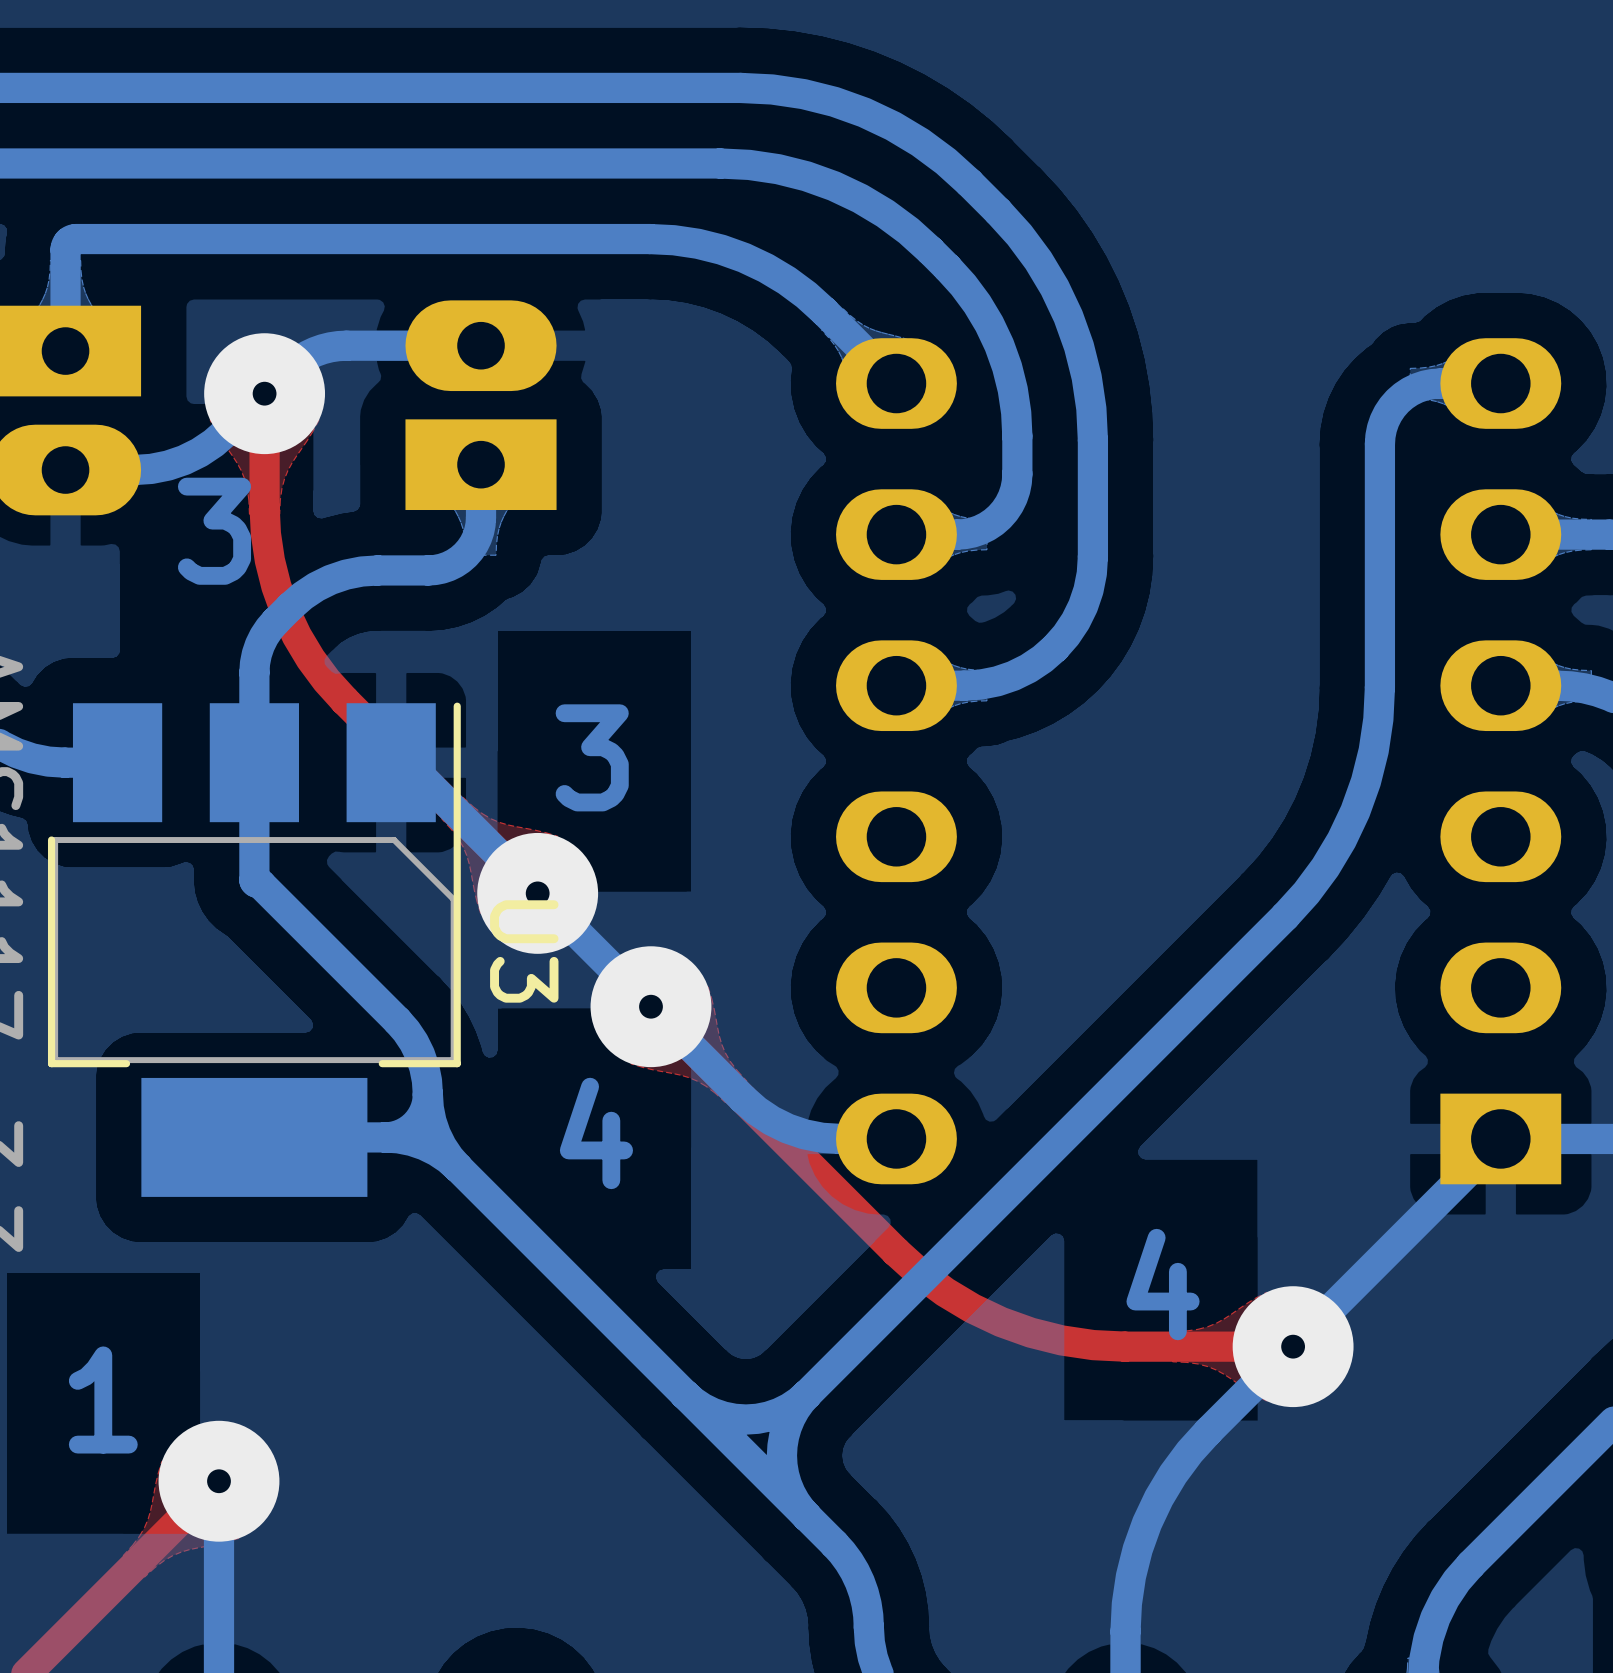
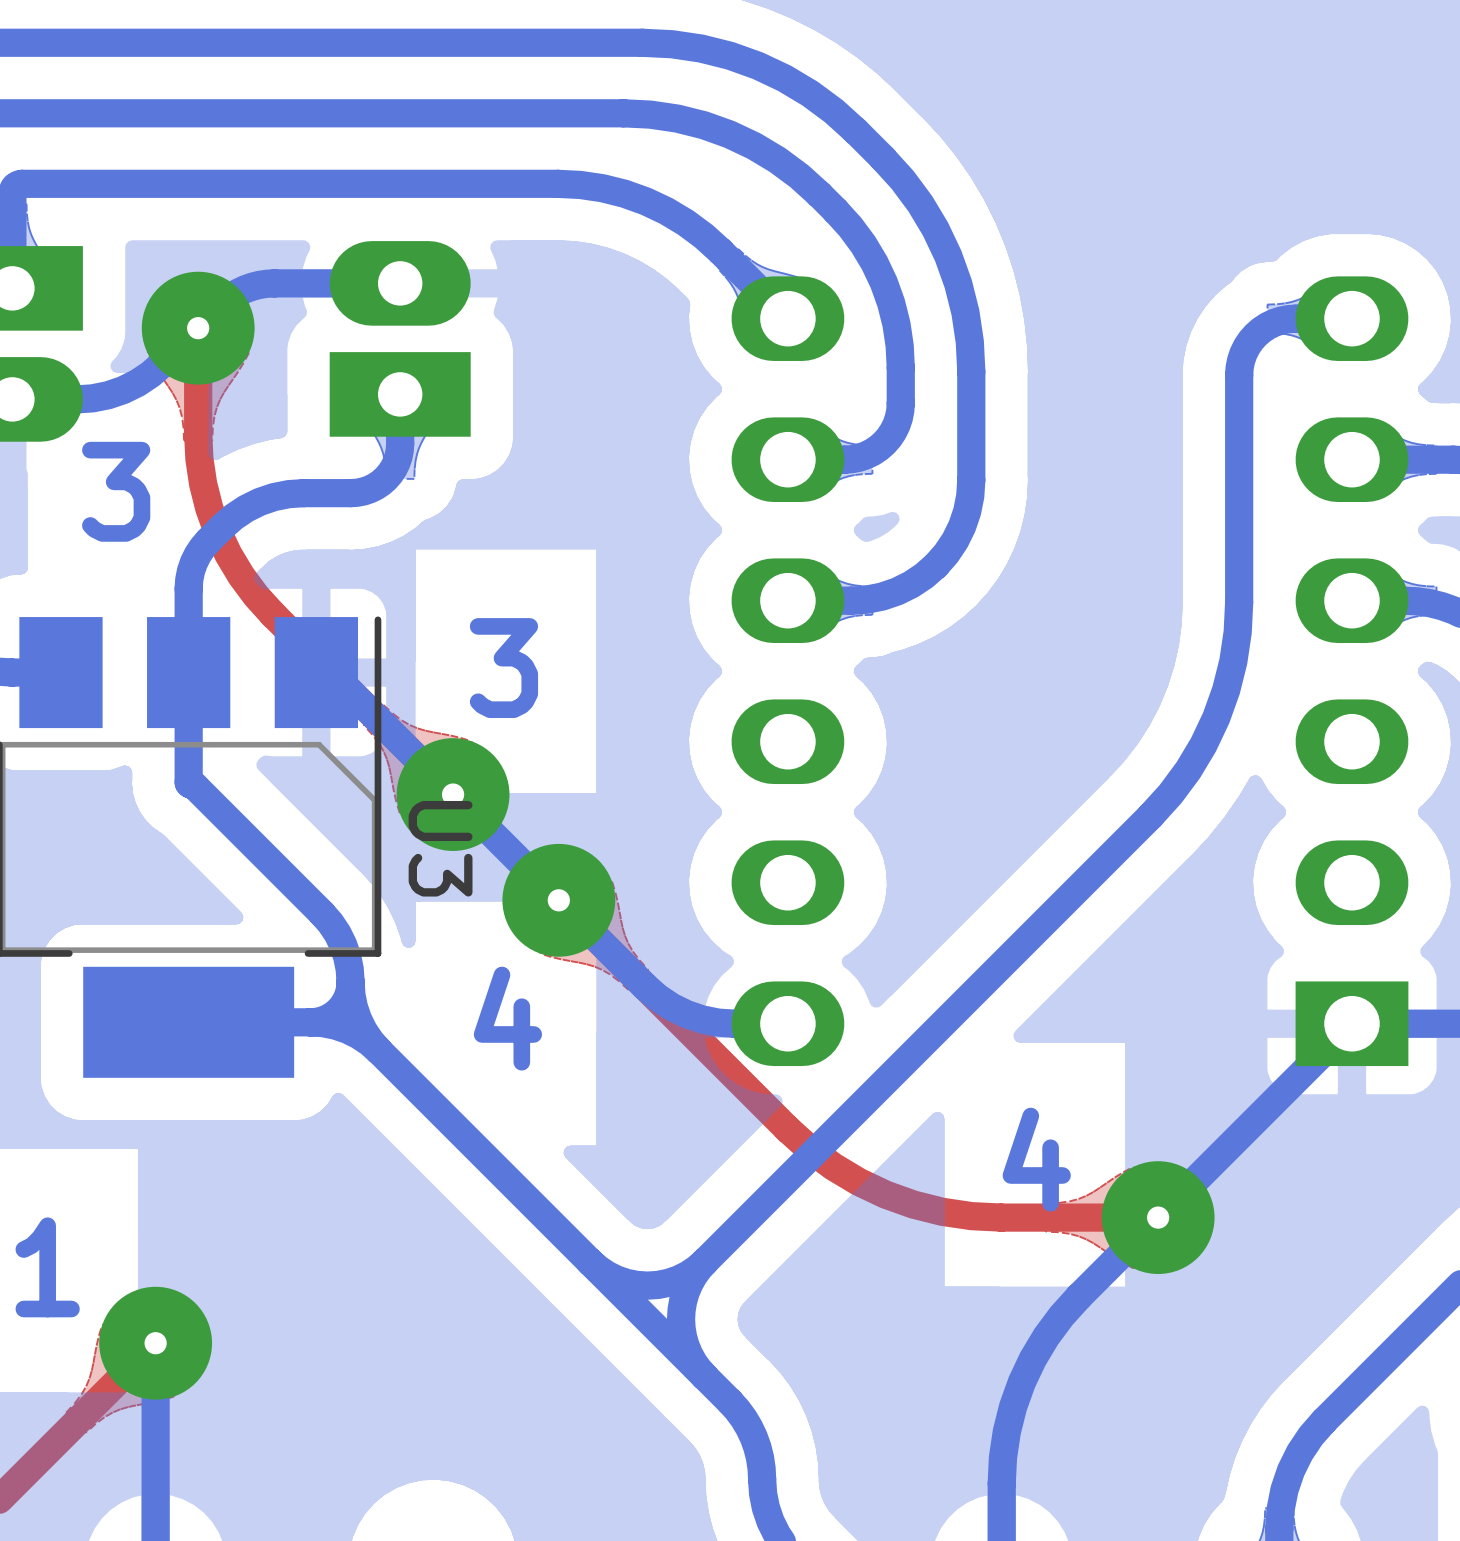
text position: 3 (214, 531) -> 3 (116, 491)

